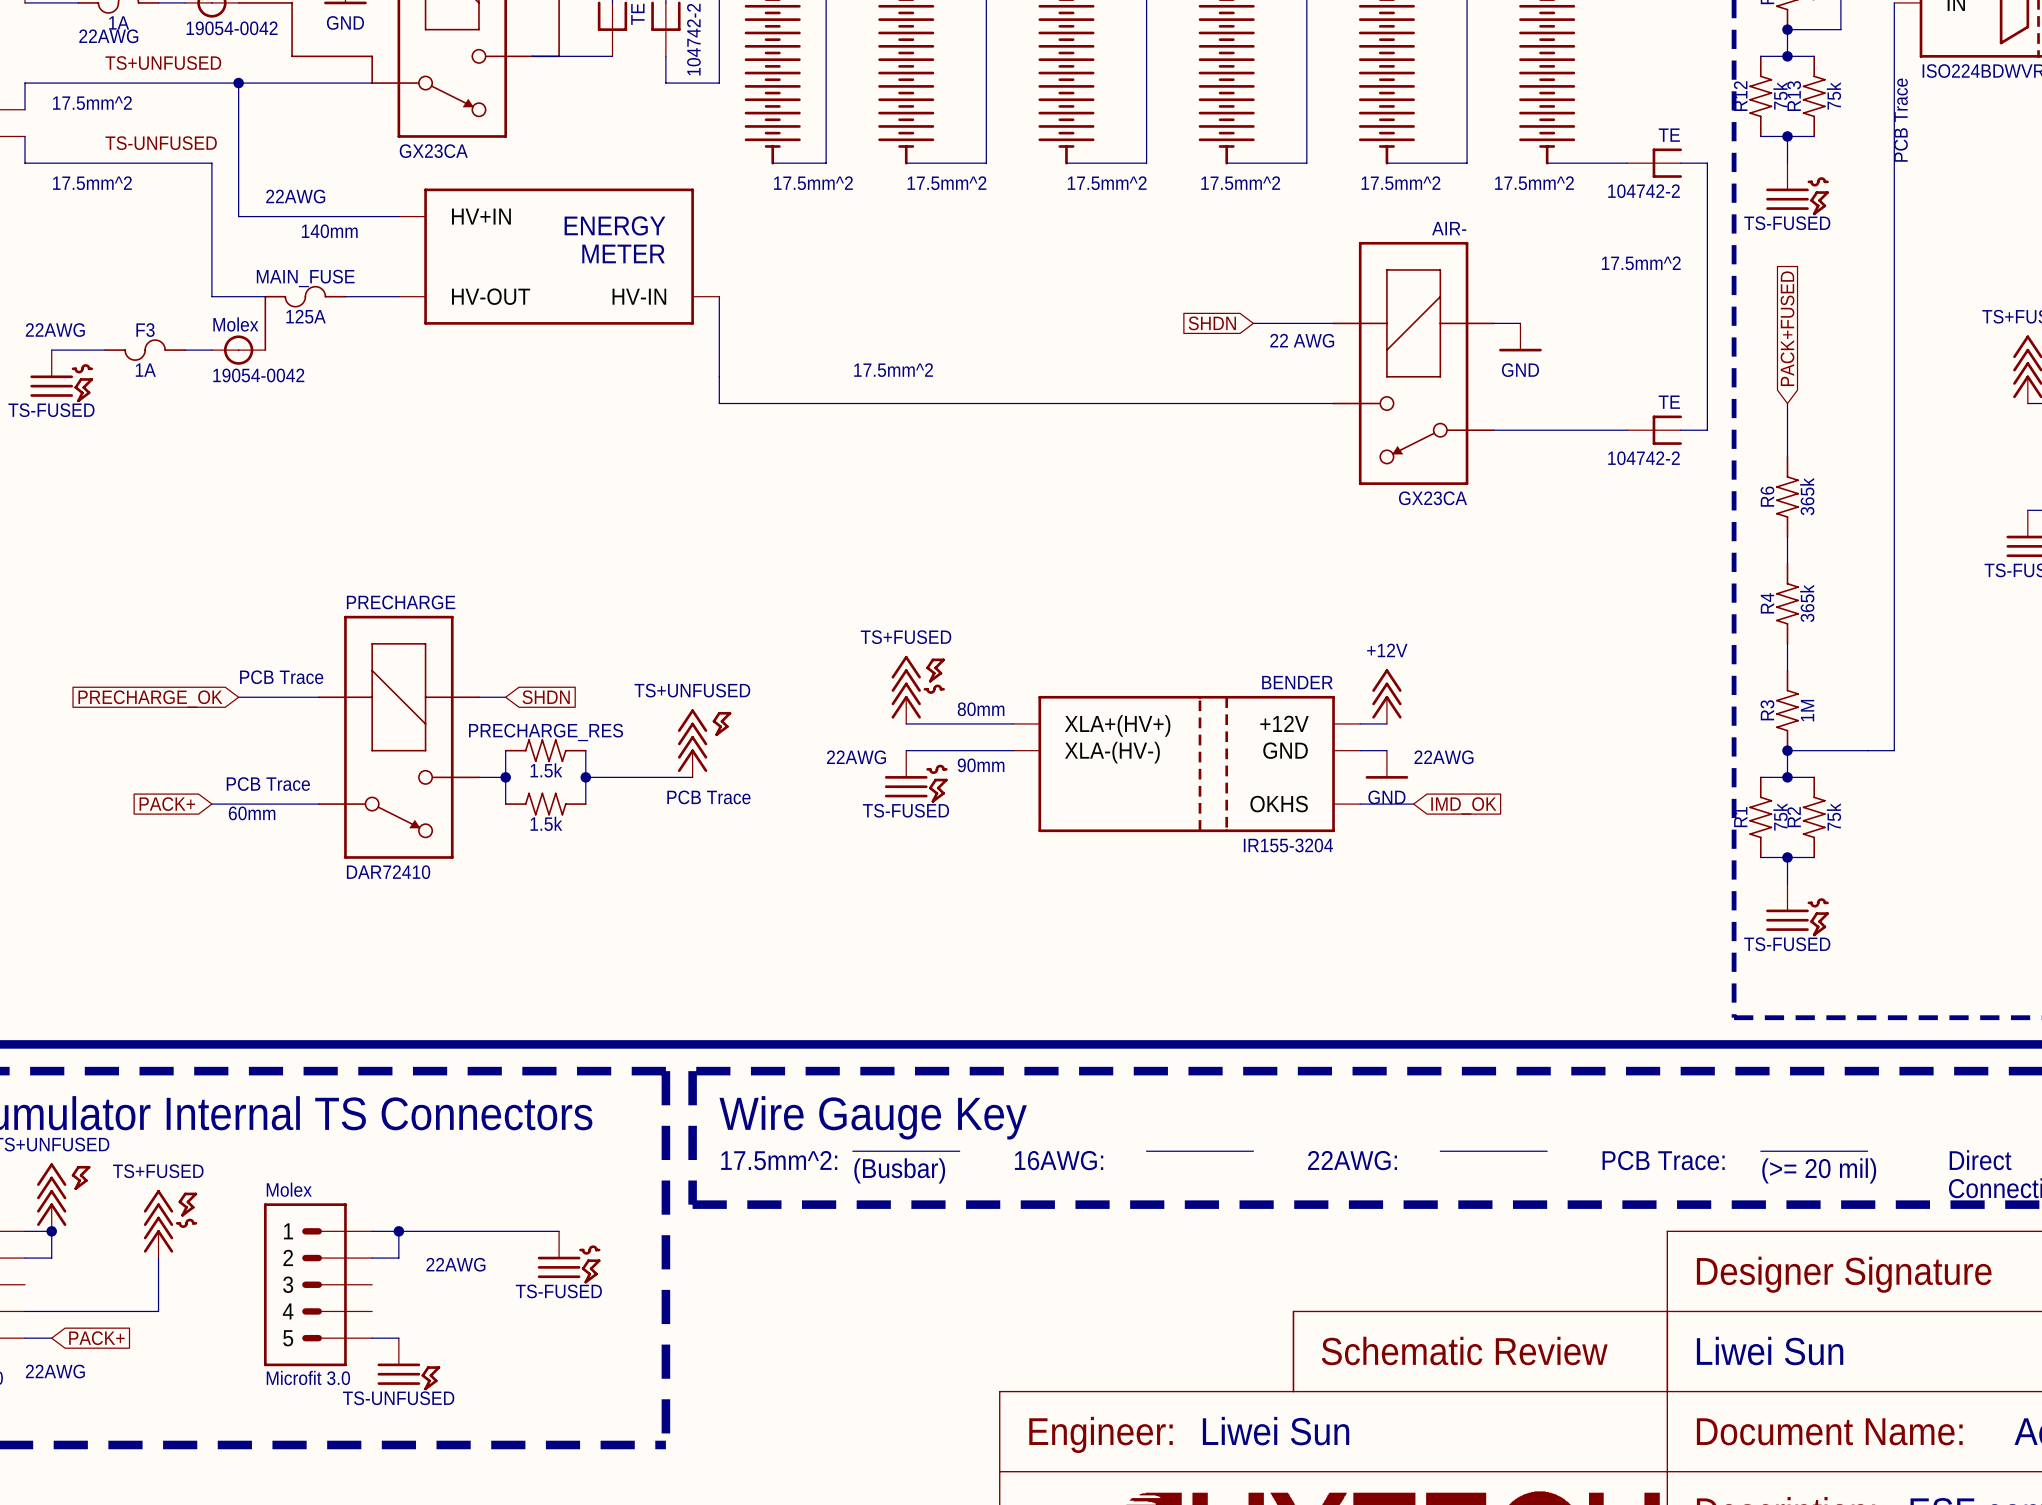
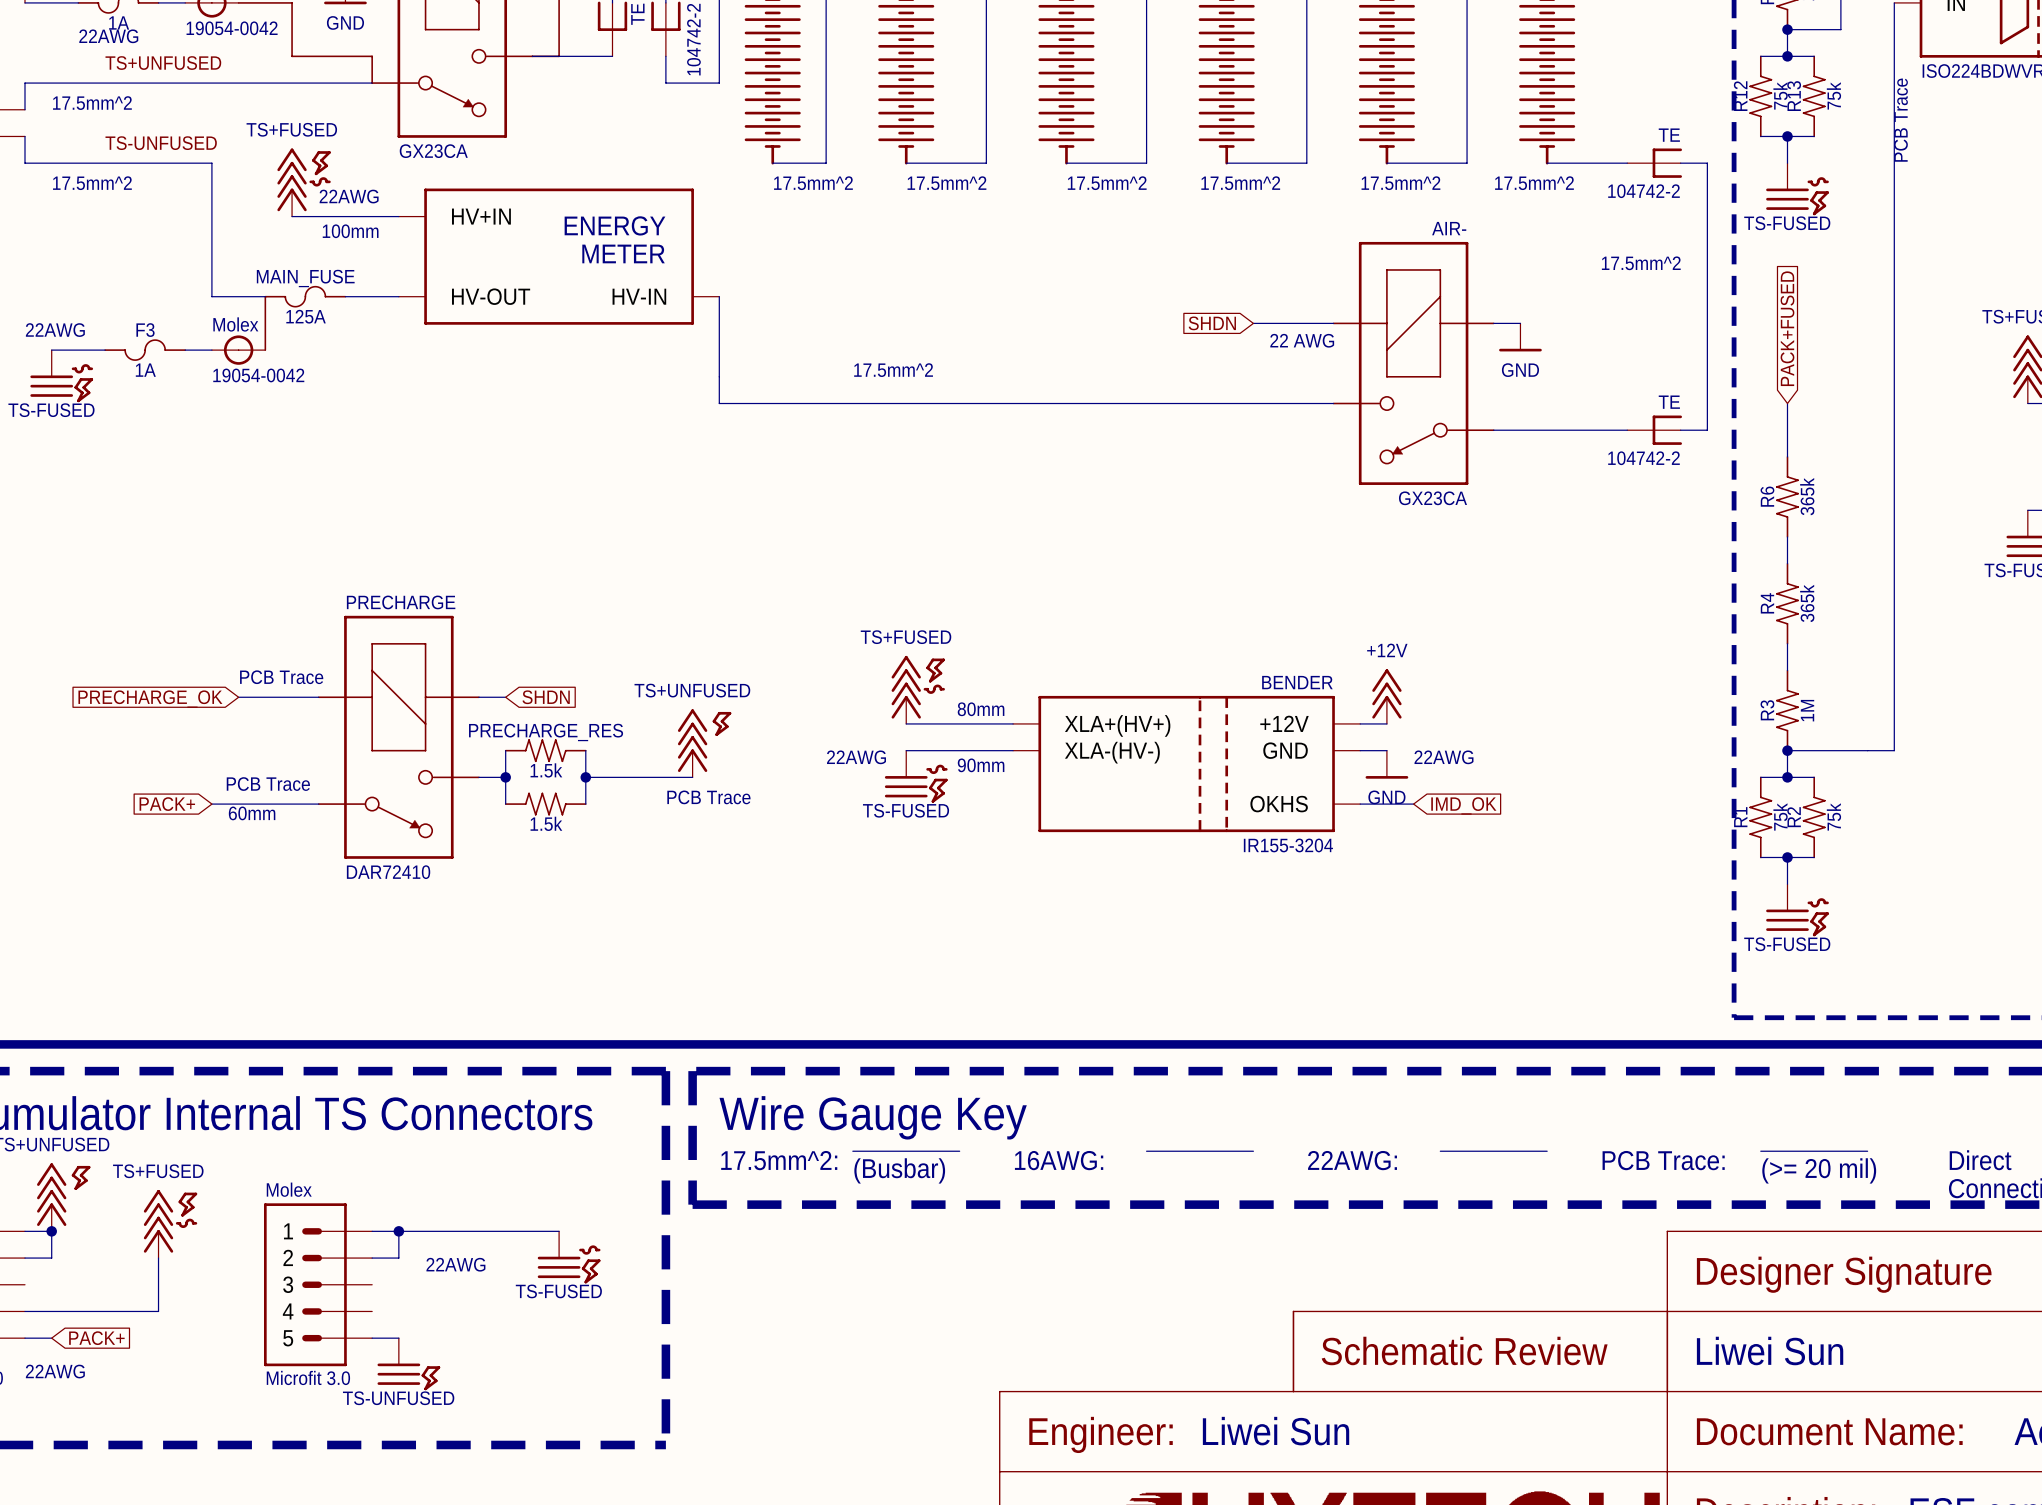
wire: (238, 83) (238, 216) (292, 216) -> none
junction: (238, 83) -> none
power symbol: none -> TS+FUSED (304, 182)
text position: 22AWG (295, 196) -> 22AWG (349, 196)
text: 140mm (329, 231) -> 100mm (350, 231)

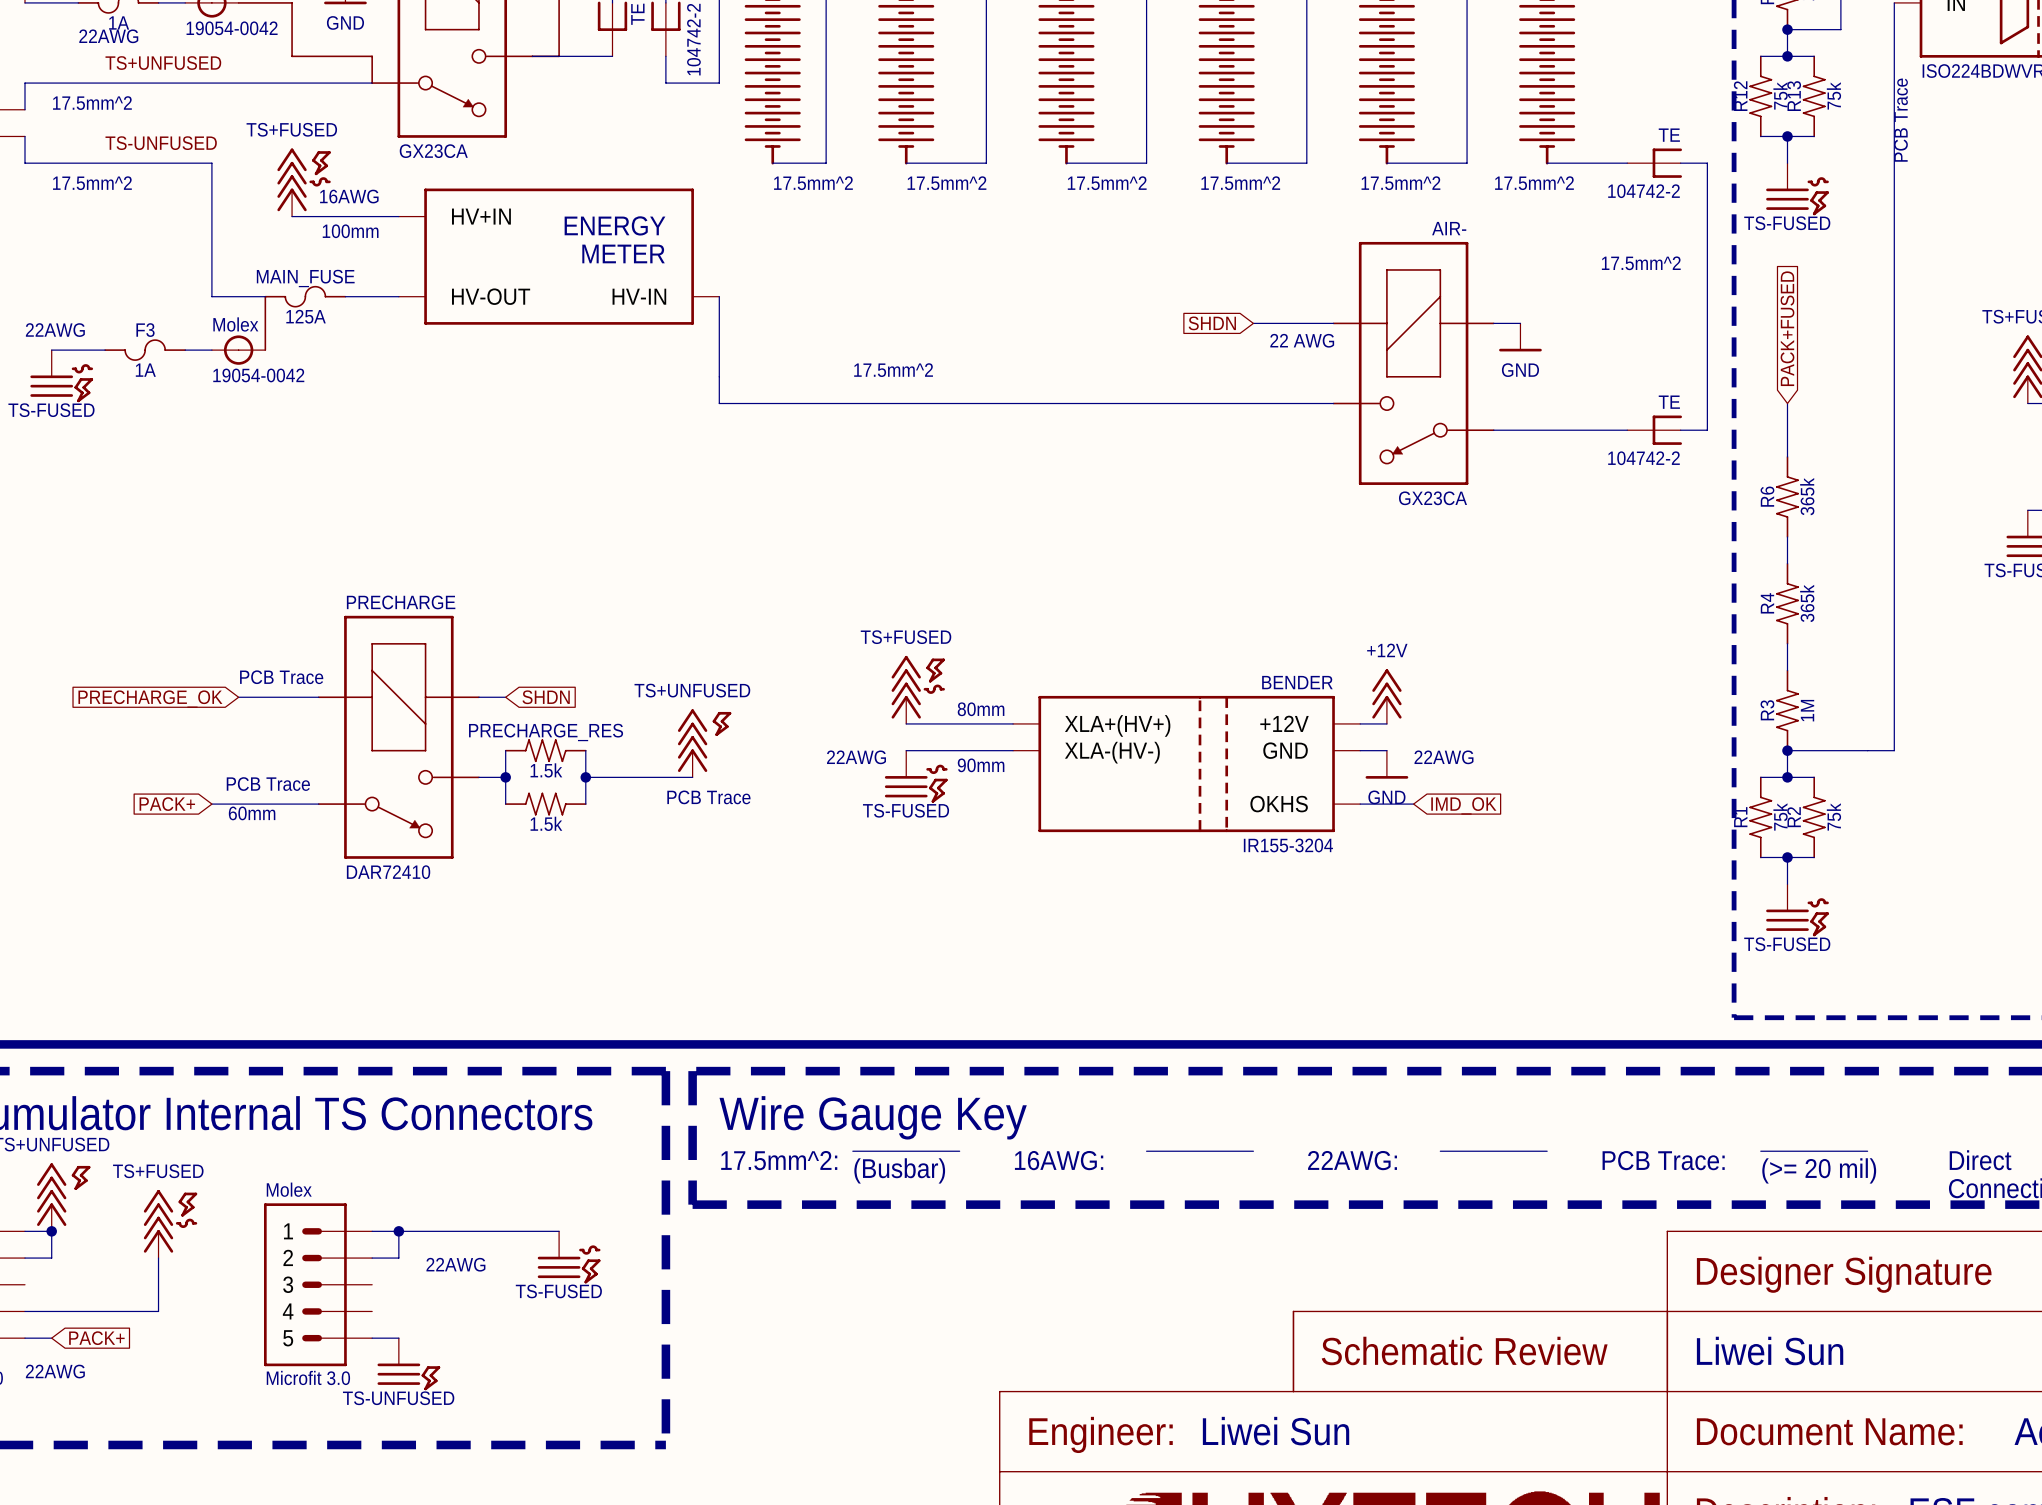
text: 22AWG (349, 196) -> 16AWG (349, 196)

